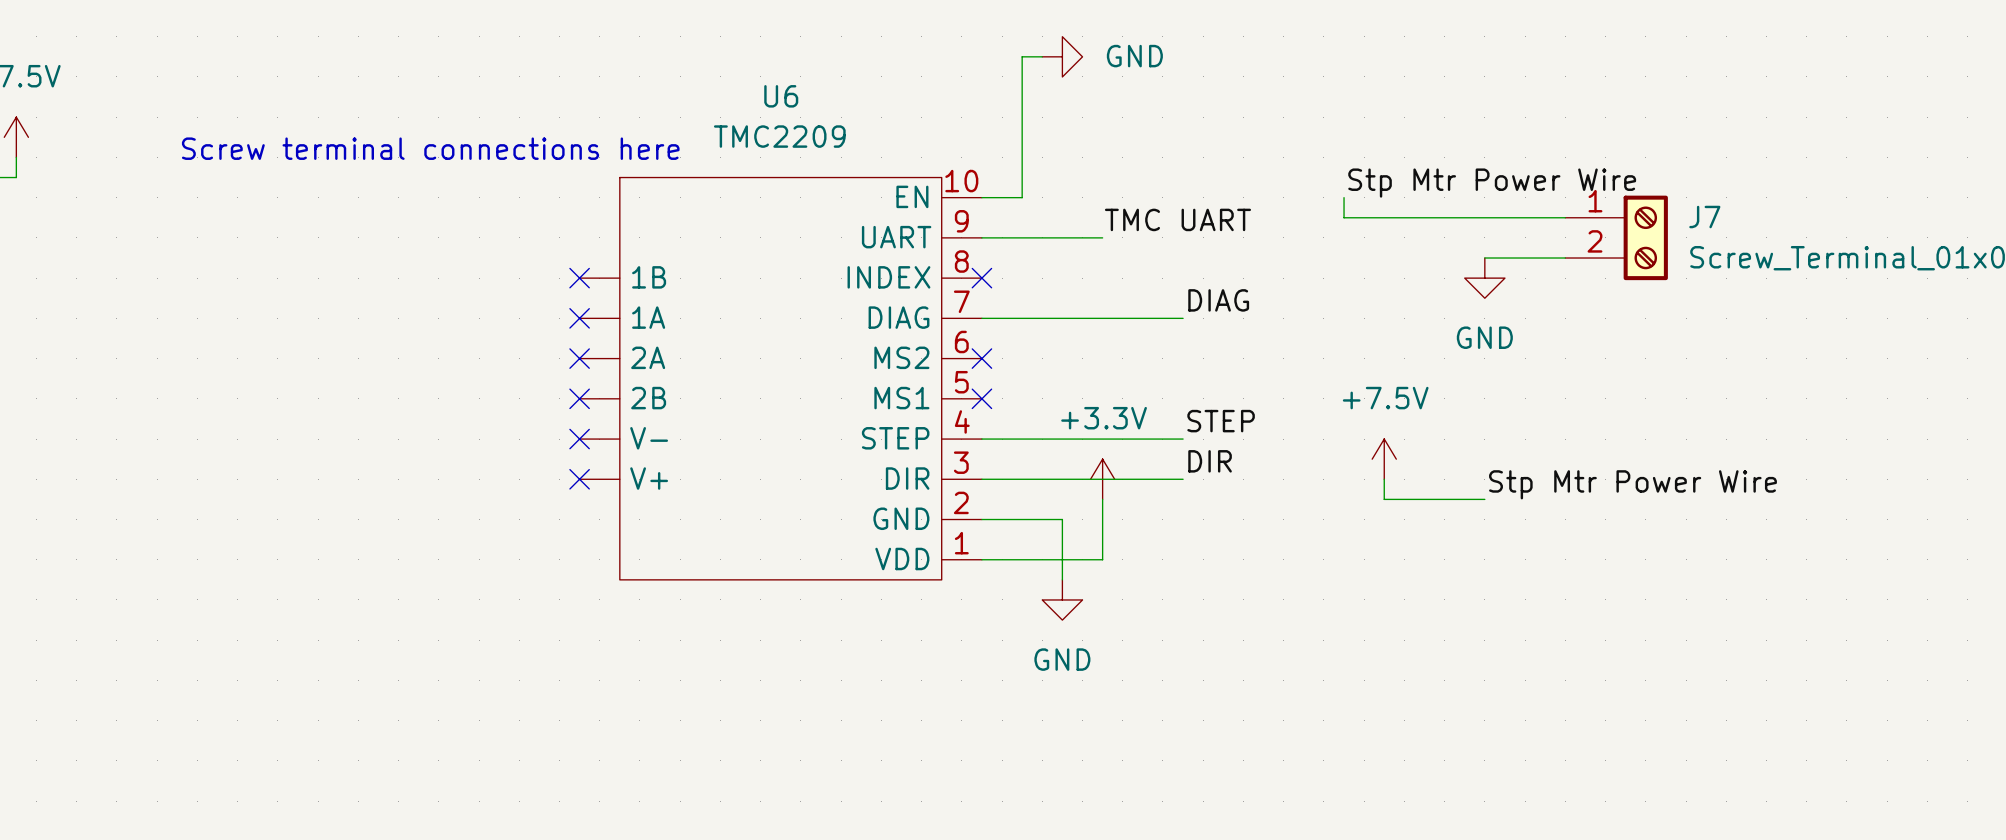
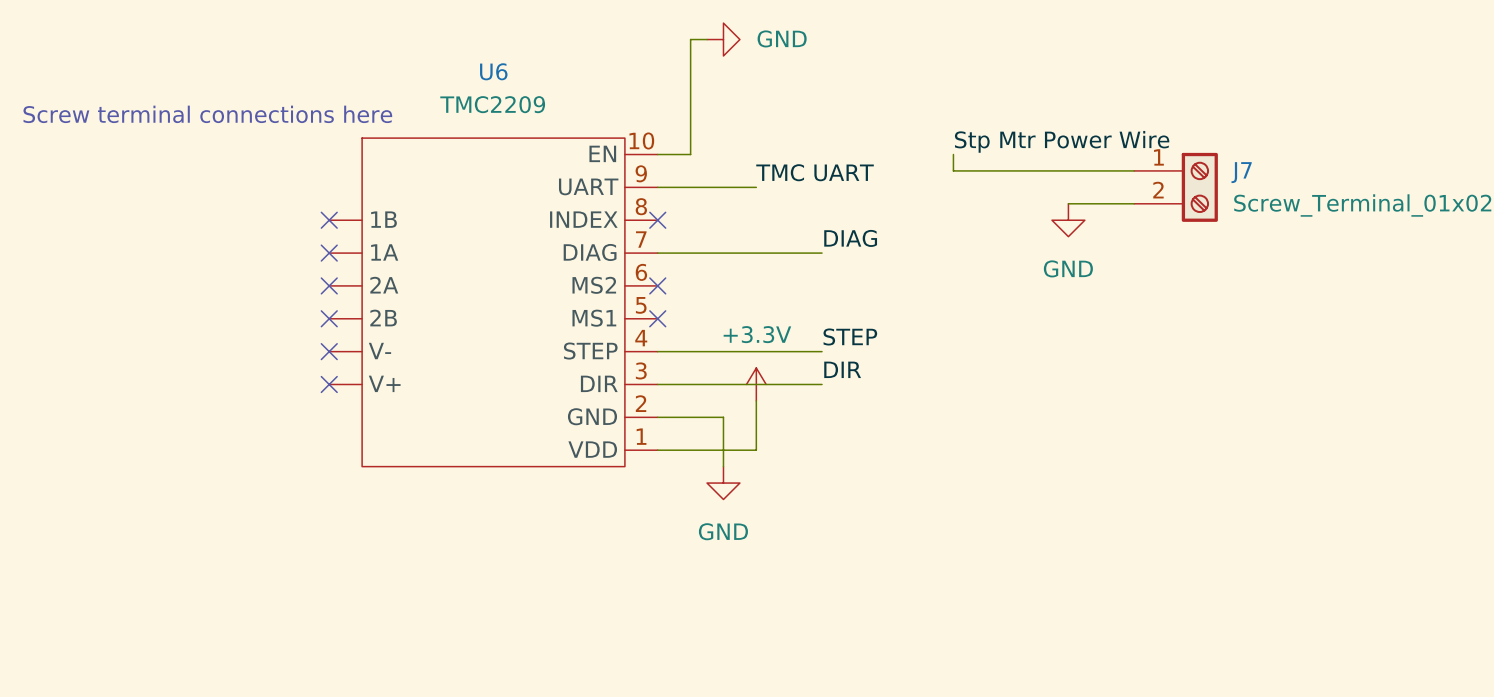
power symbol: +7.5V (1384, 459) -> none
wire: (1384, 479) (1384, 499) (1484, 499) -> none
label: Stp Mtr Power Wire (1632, 484) -> none

